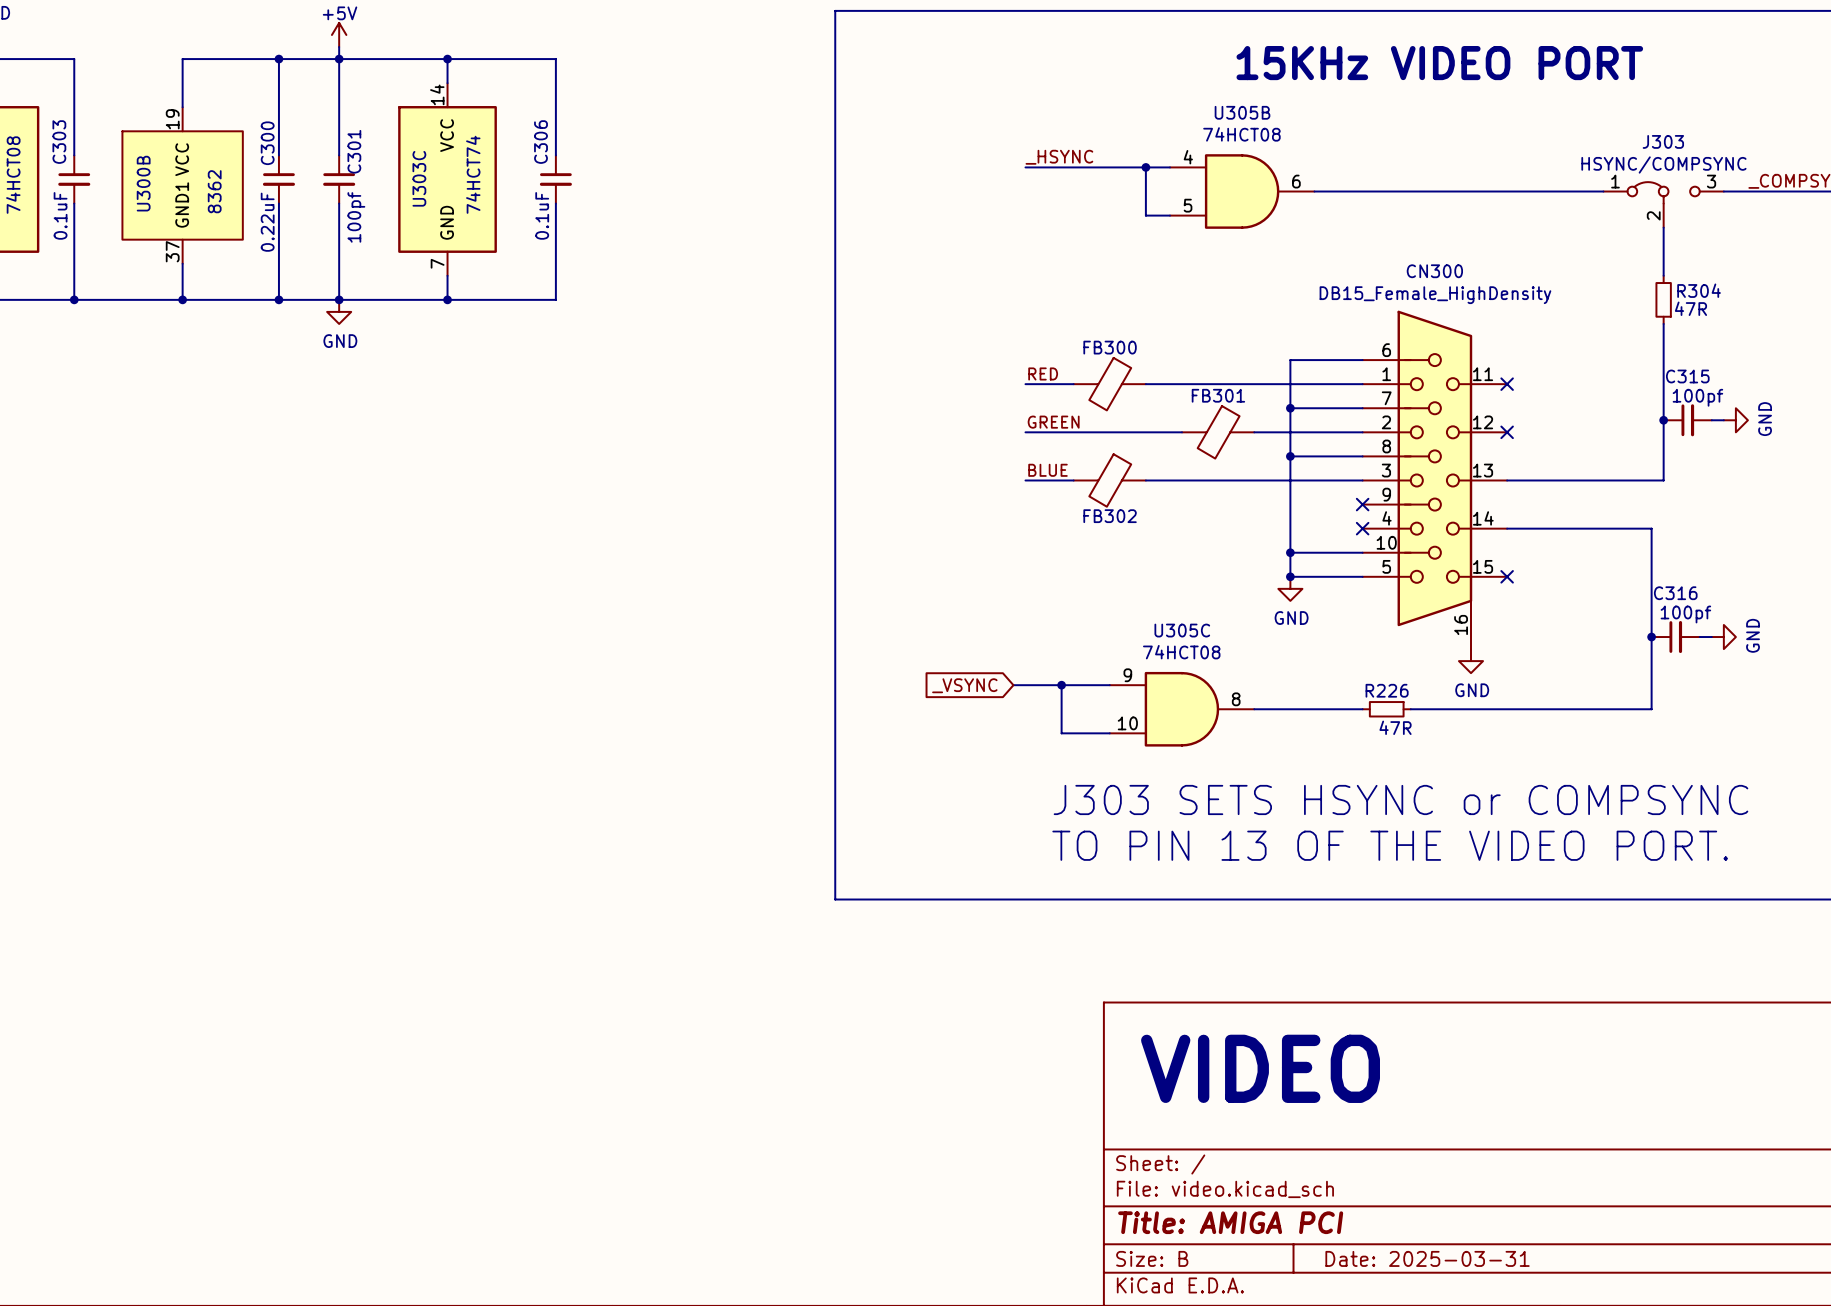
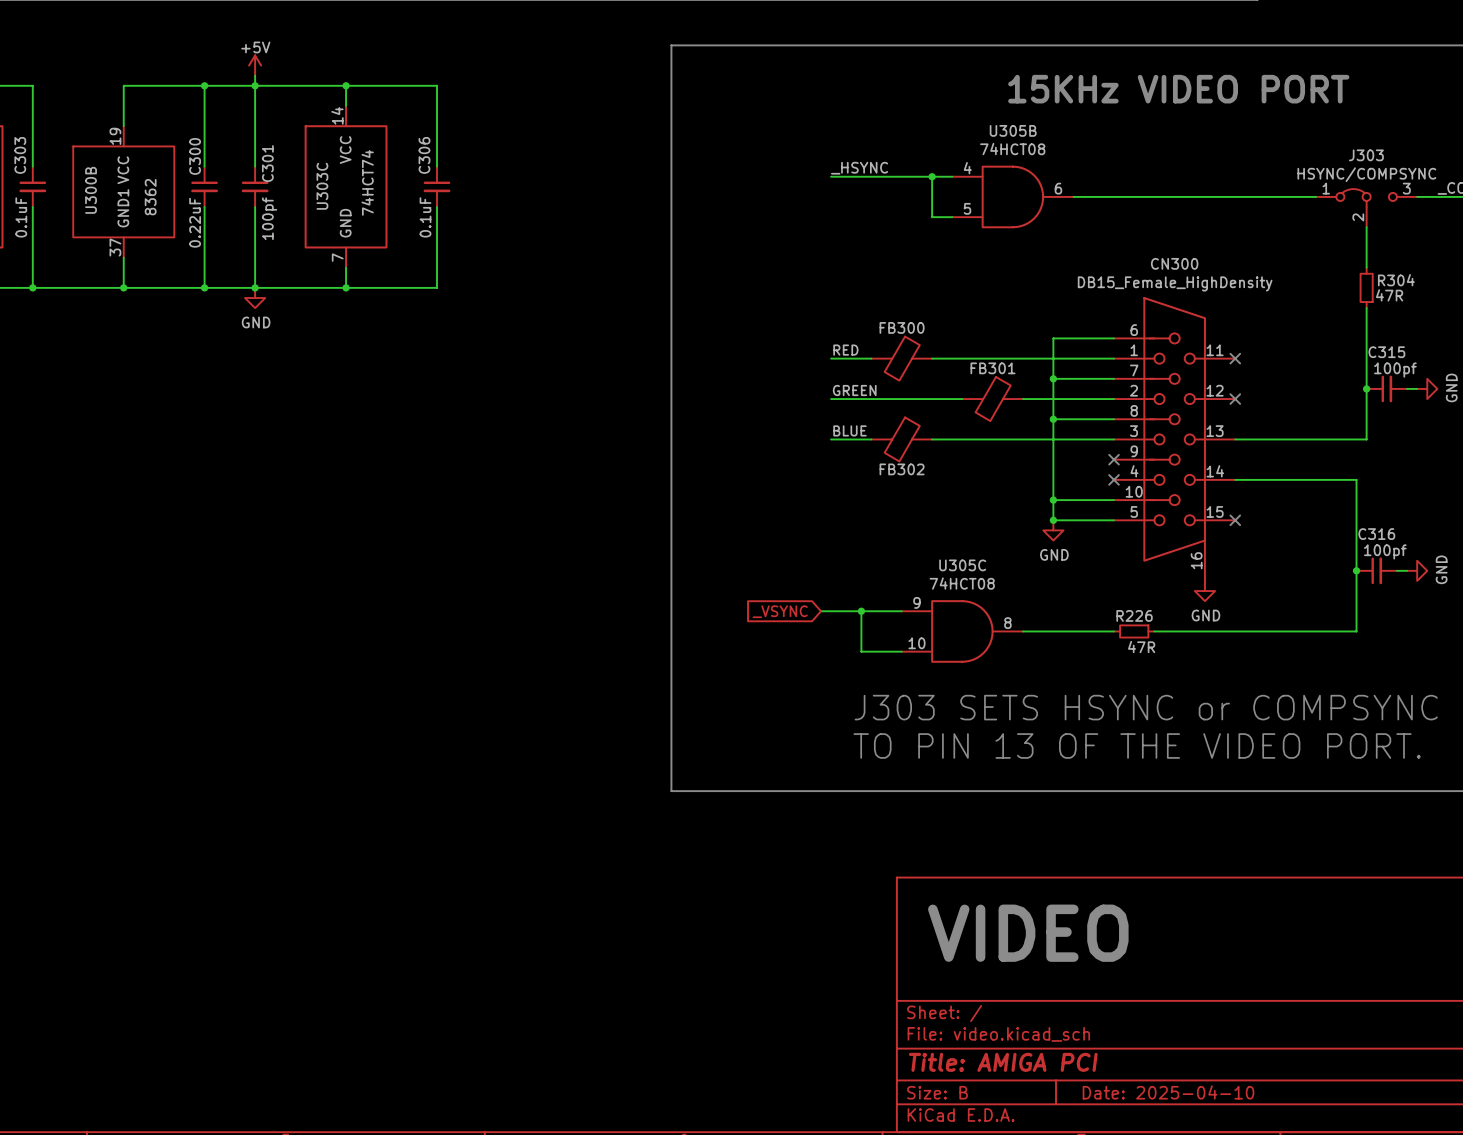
title block: Date: 2025-03-31 (1427, 1258) -> Date: 2025-04-10 (1168, 1092)

